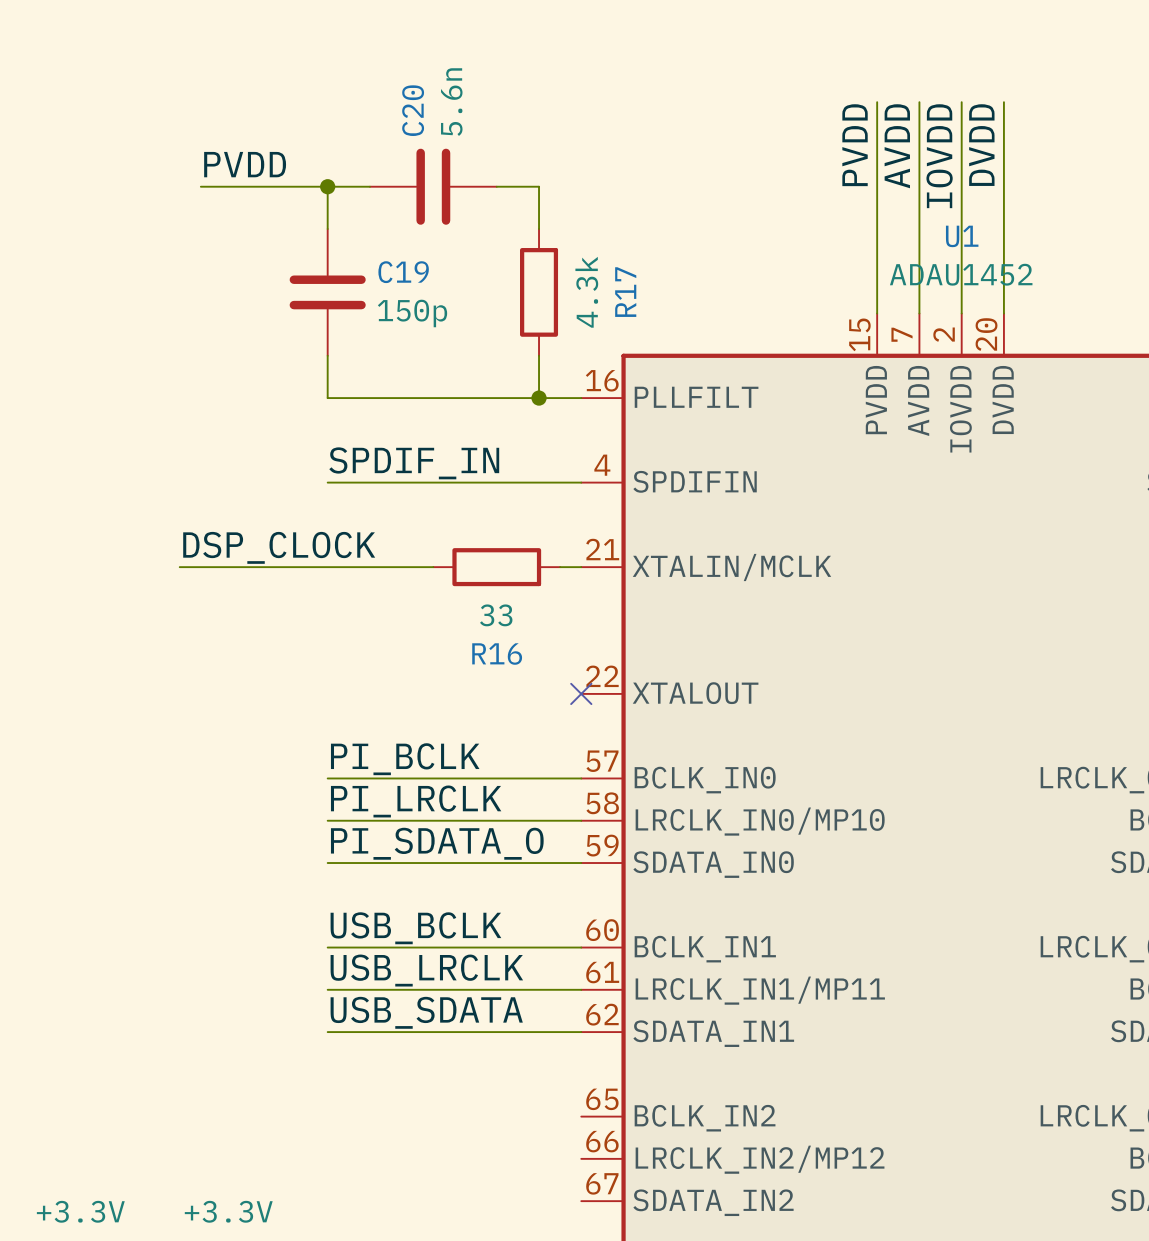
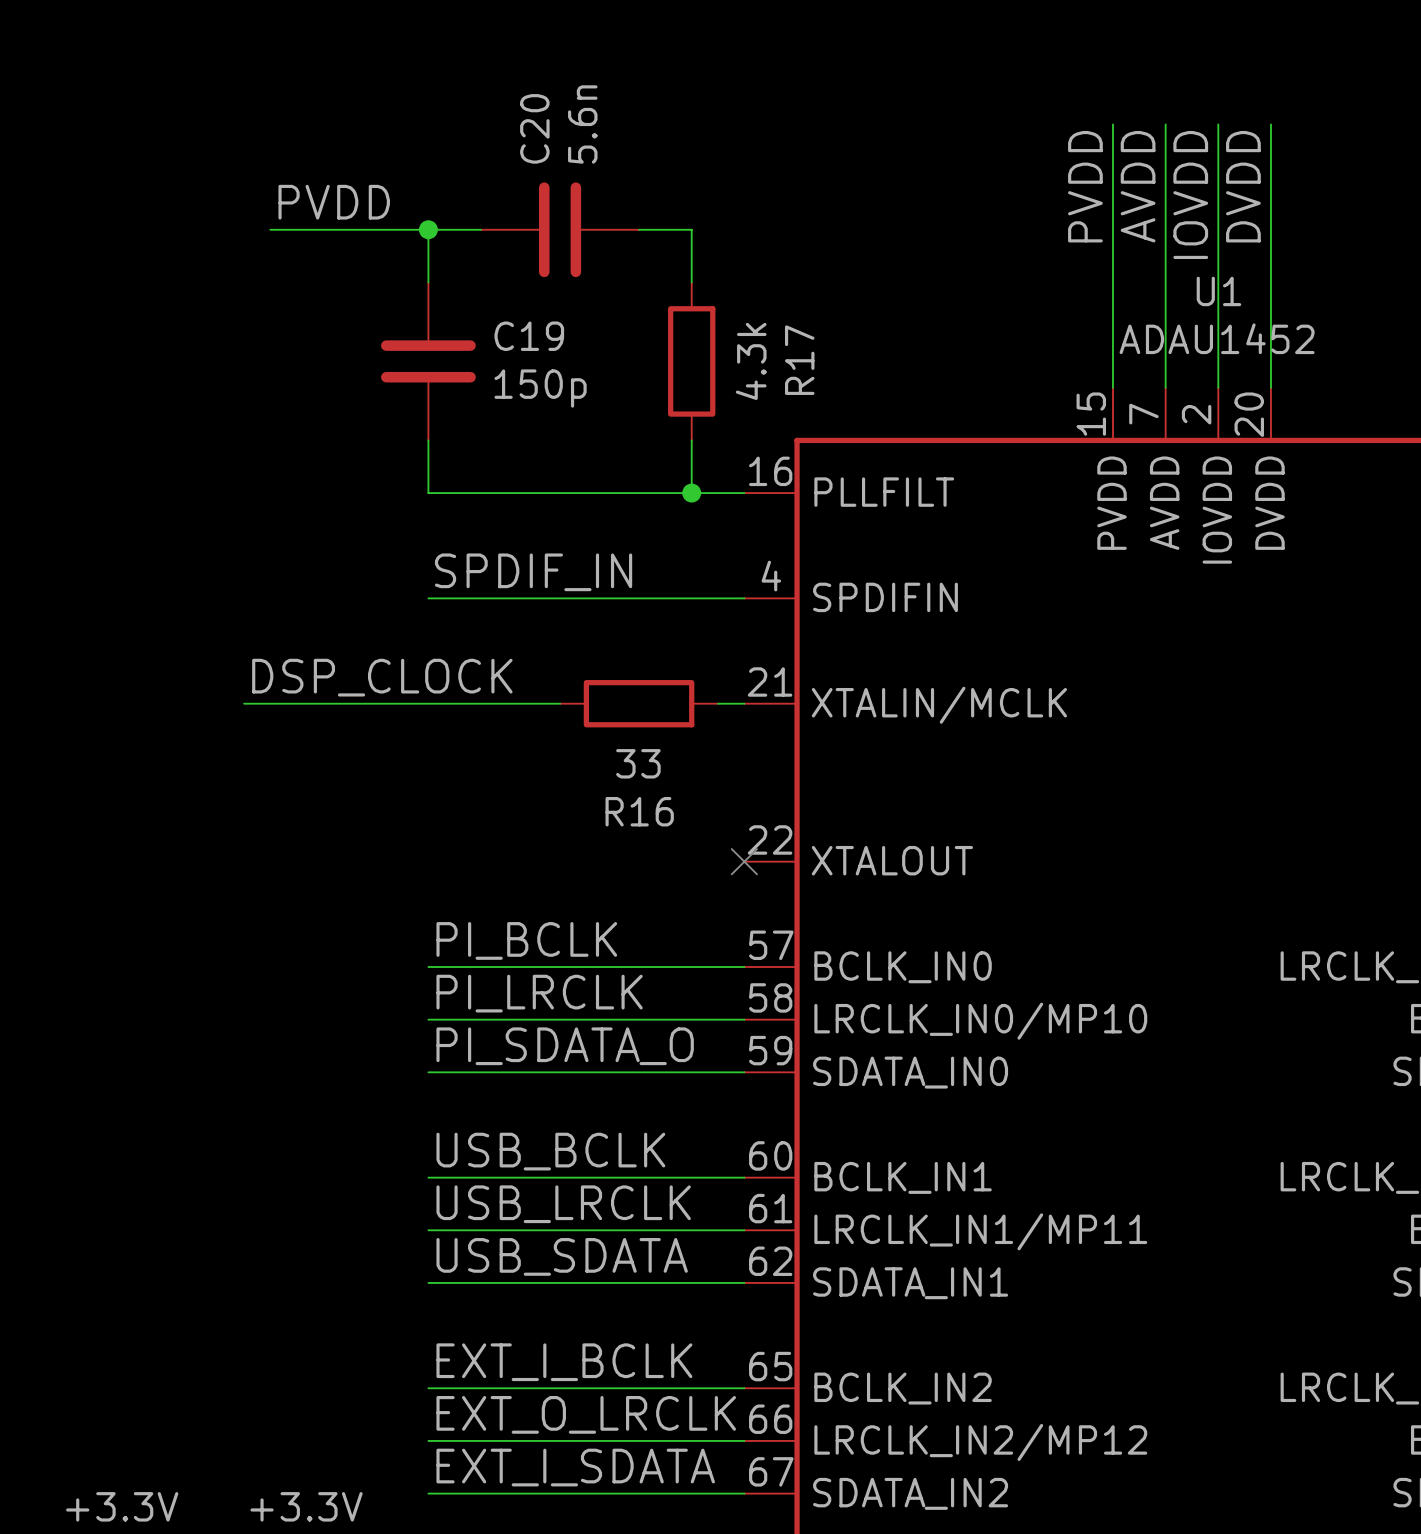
label: none -> EXT_I_BCLK (564, 1362)
wire: none -> (428, 1388) (744, 1388)
label: none -> EXT_O_LRCLK (586, 1414)
wire: none -> (428, 1440) (744, 1440)
label: none -> EXT_I_SDATA (575, 1467)
wire: none -> (428, 1493) (744, 1493)

